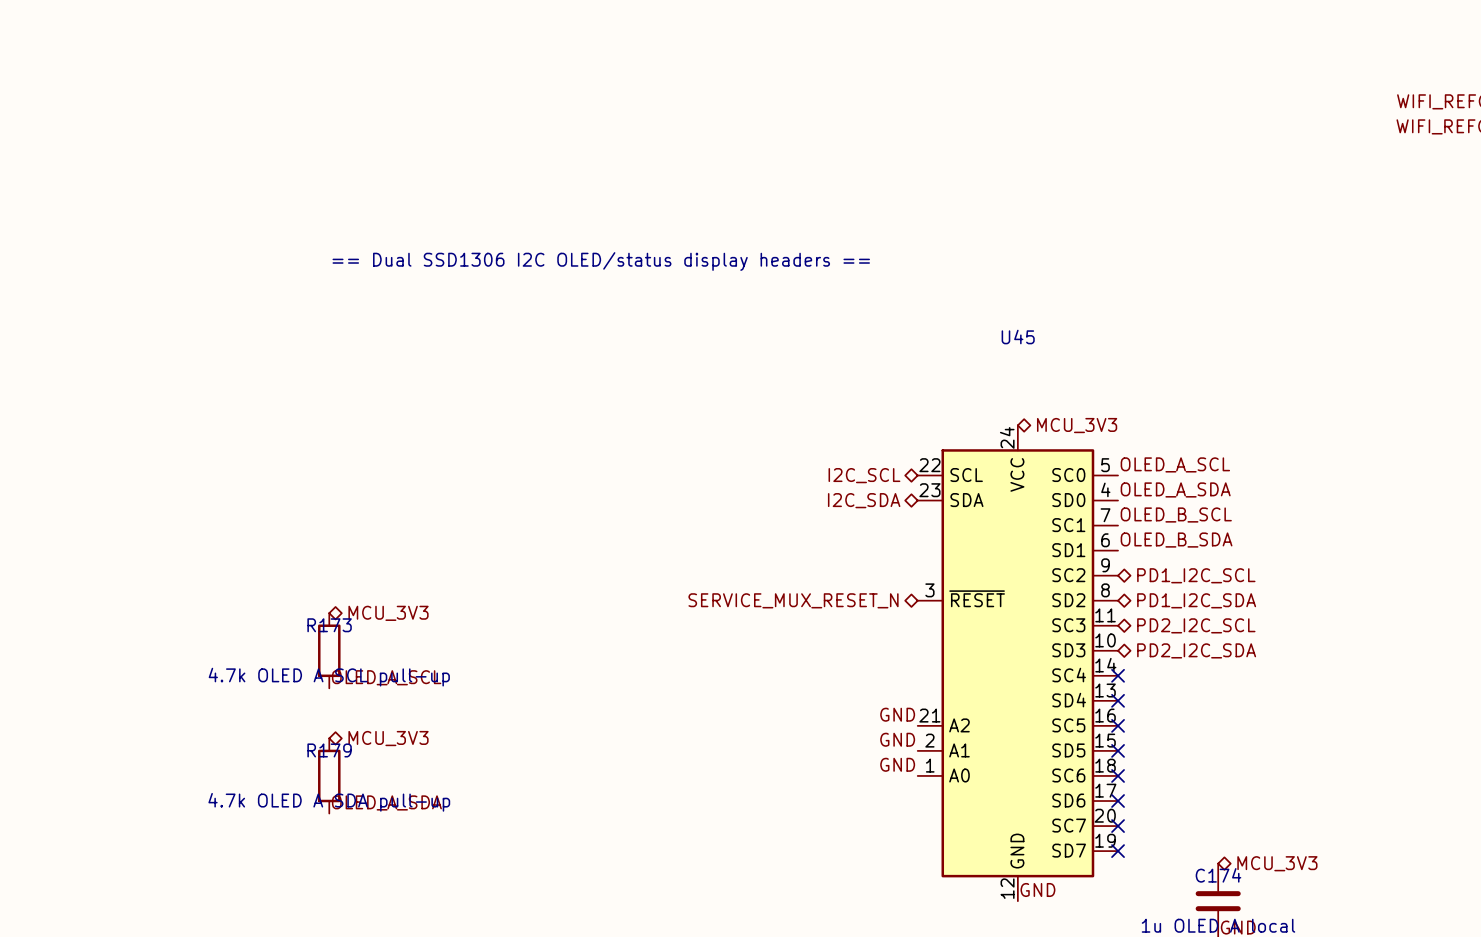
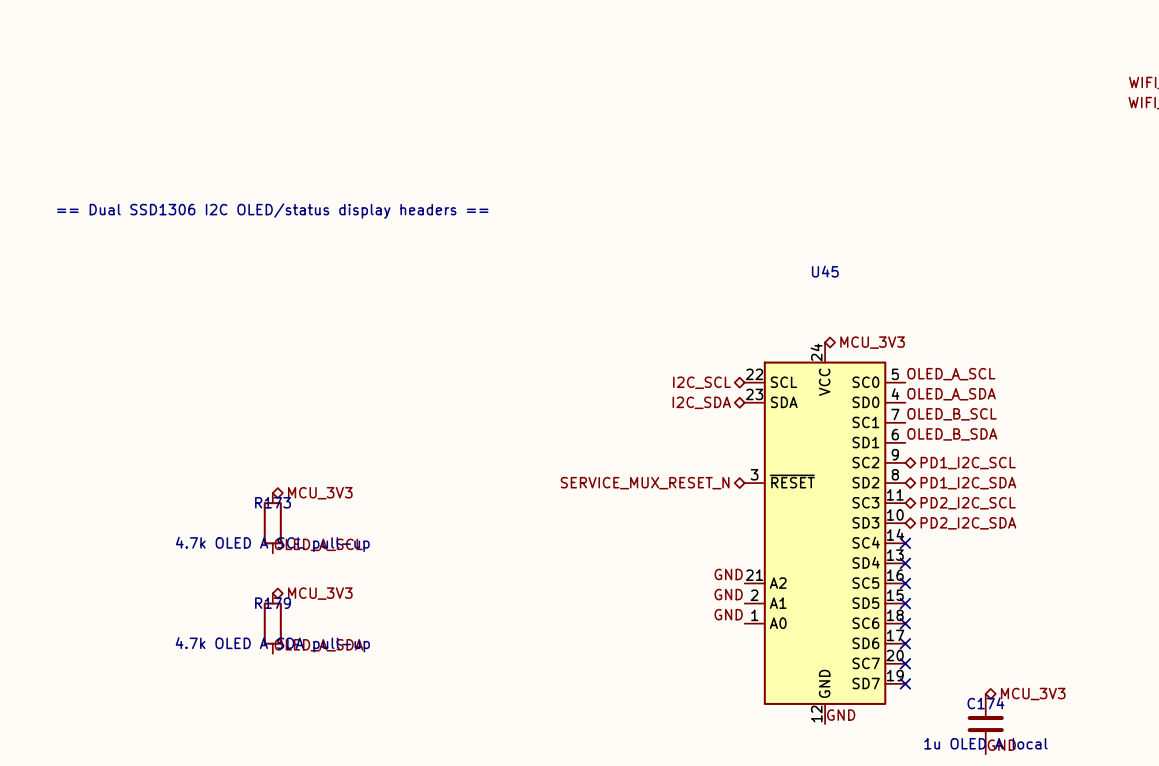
text position: == Dual SSD1306 I2C OLED/status display headers == (601, 261) -> == Dual SSD1306 I2C OLED/status display headers == (272, 211)

